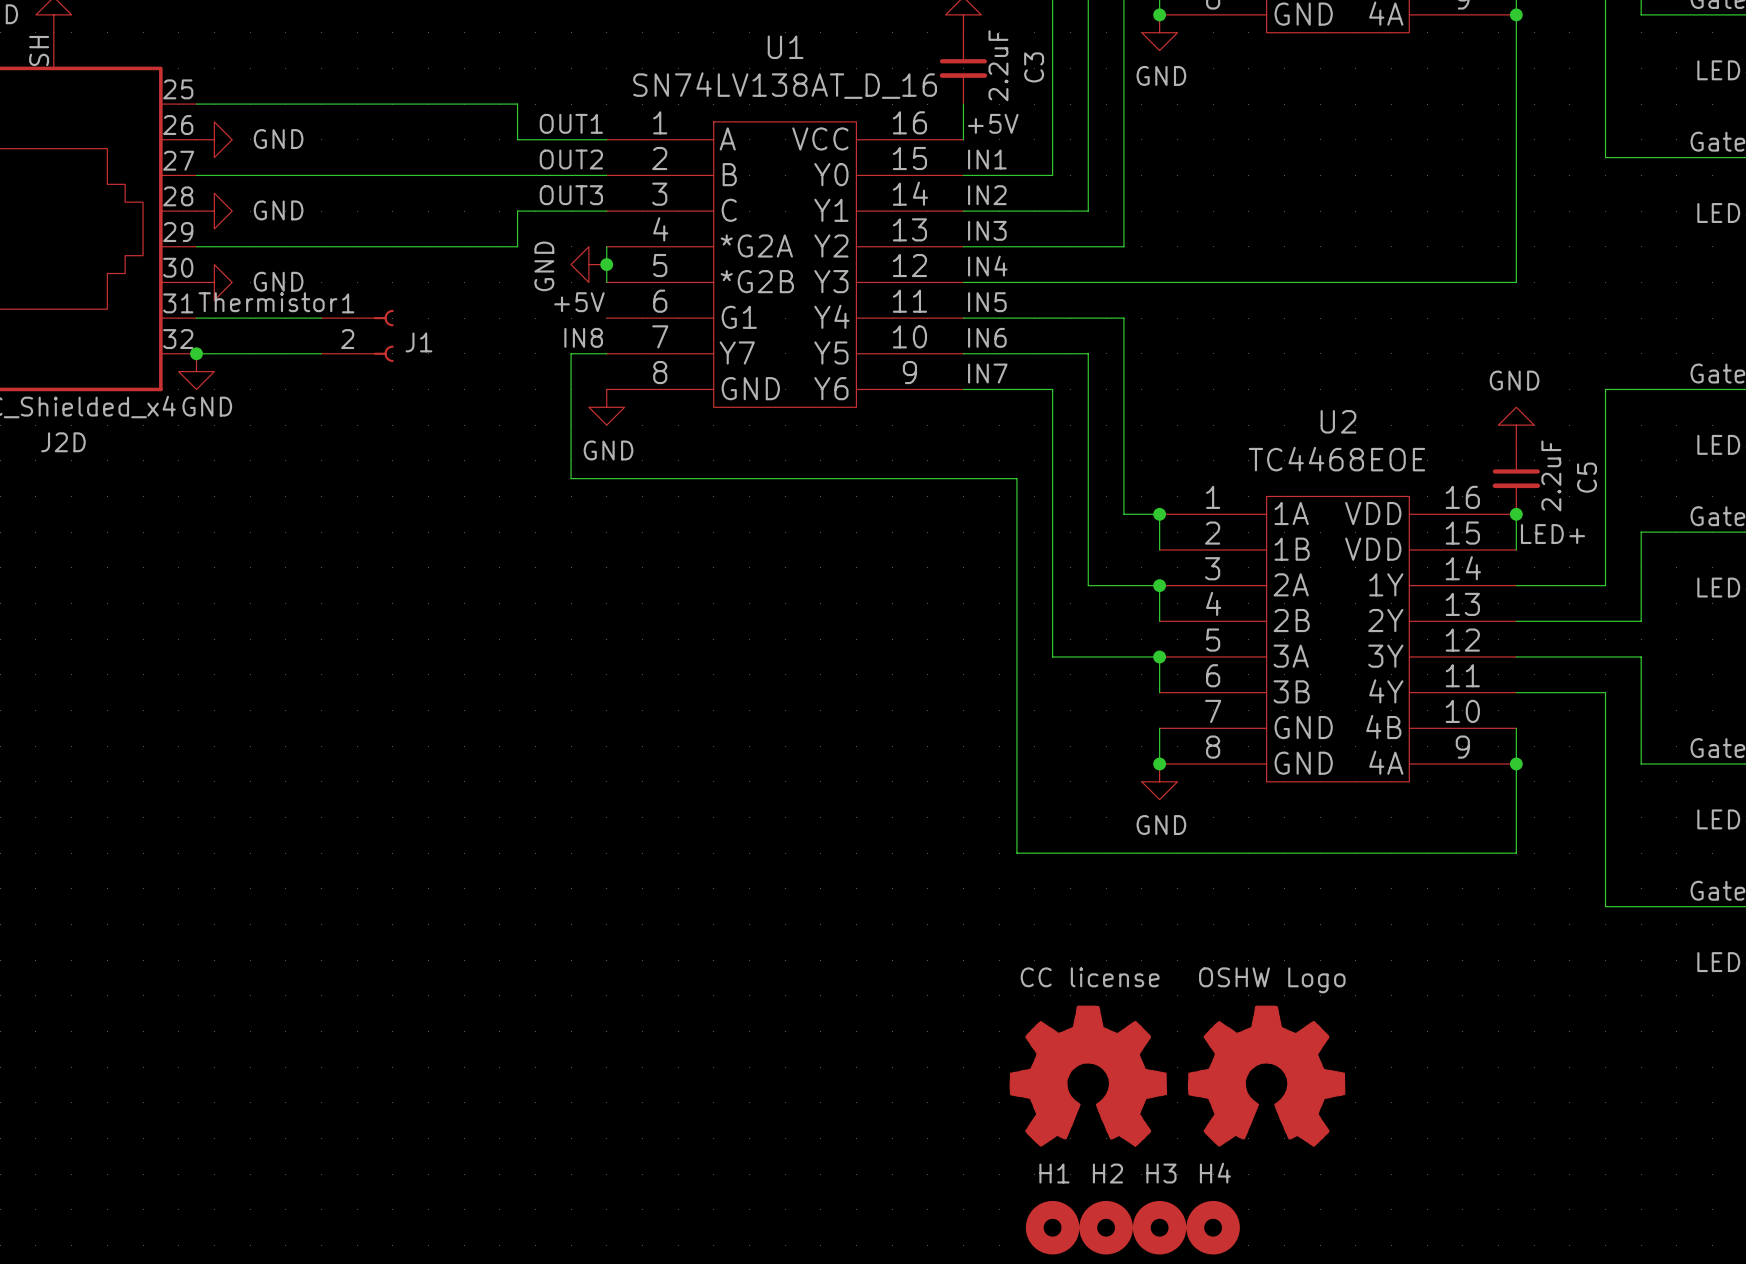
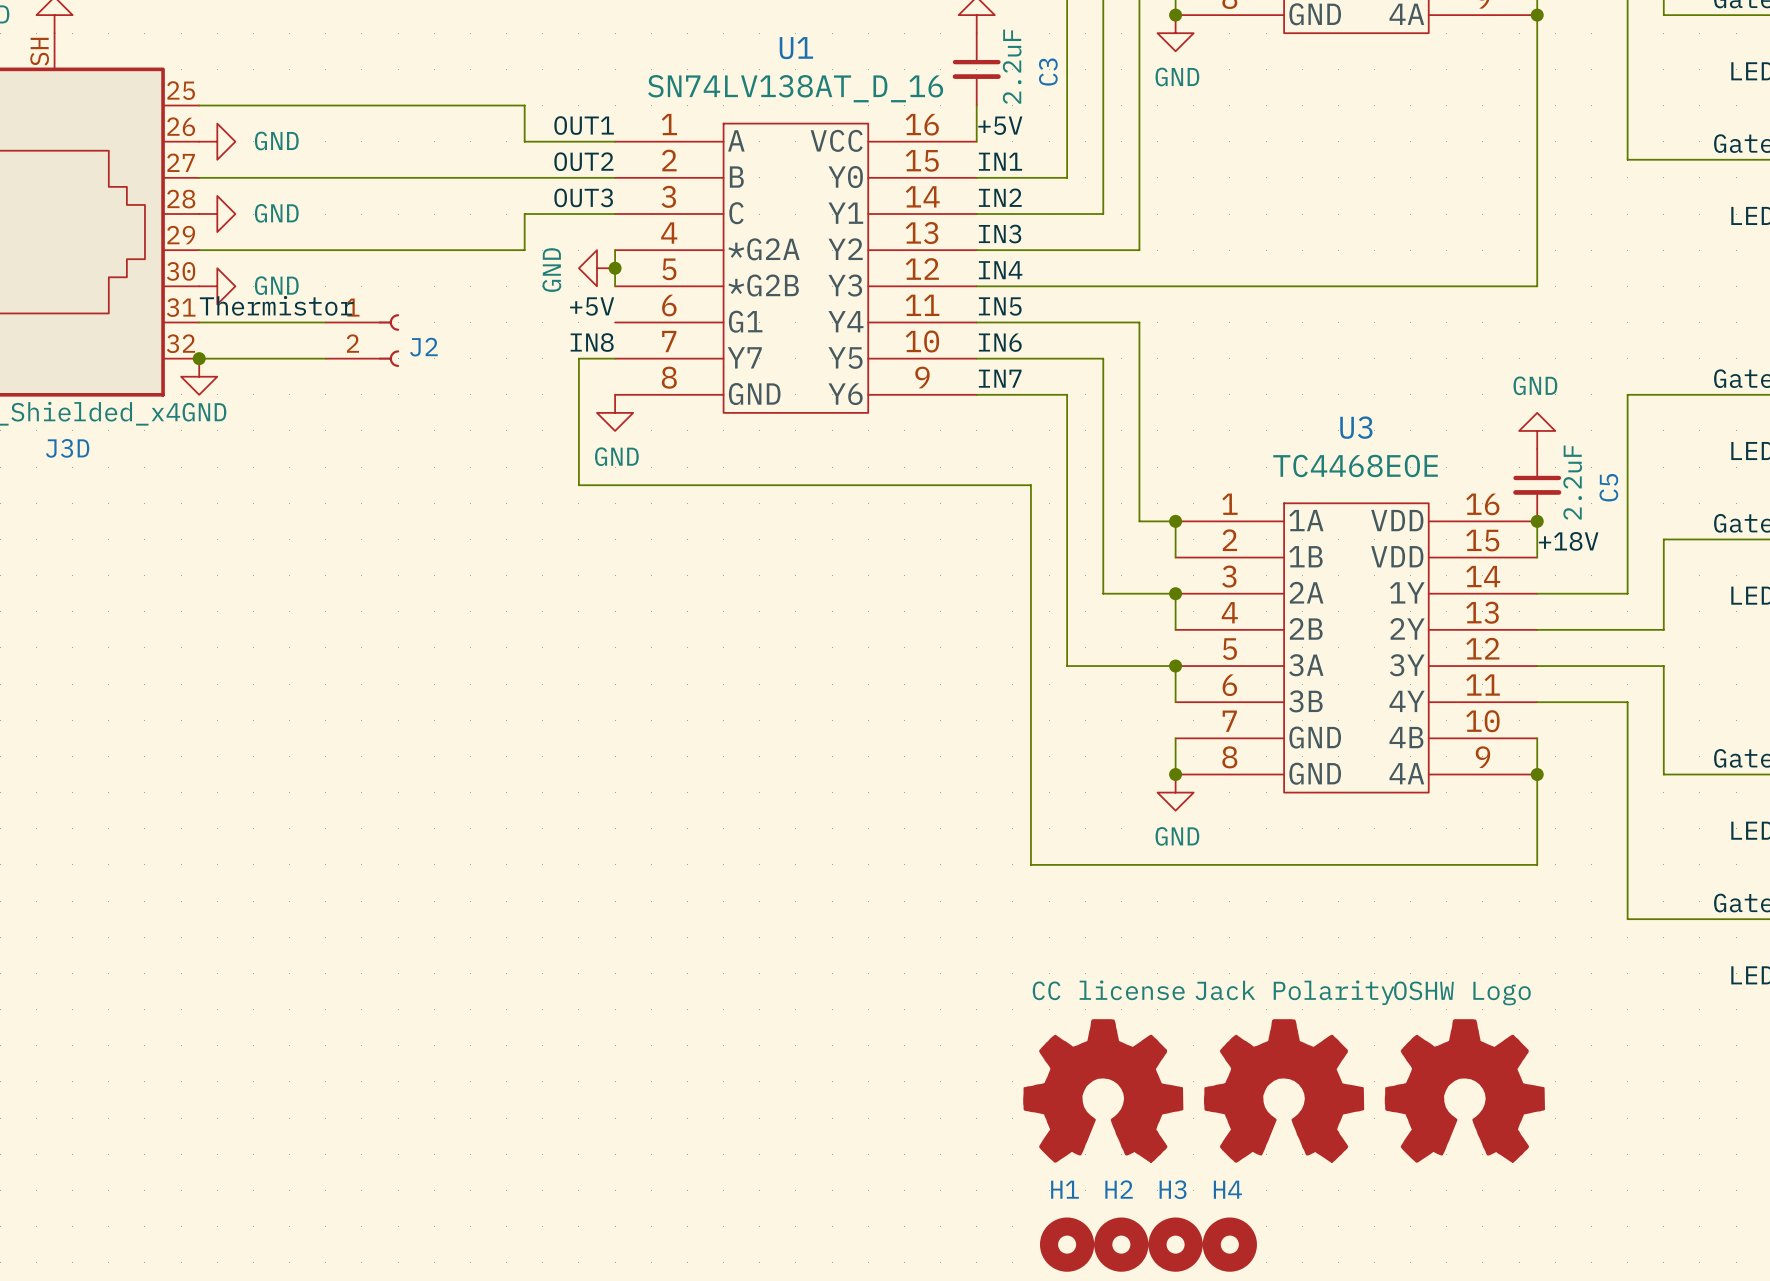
J1 name: J1 (418, 342) -> J2 (423, 347)
U2 name: U2 (1338, 421) -> U3 (1356, 427)
J2D name: J2D (63, 442) -> J3D (67, 448)
label: LED+ (1552, 534) -> +18V (1568, 541)
part value: OSHW Logo (1272, 980) -> Jack Polarity (1294, 992)
part: none -> OSHW Logo (1464, 1090)

